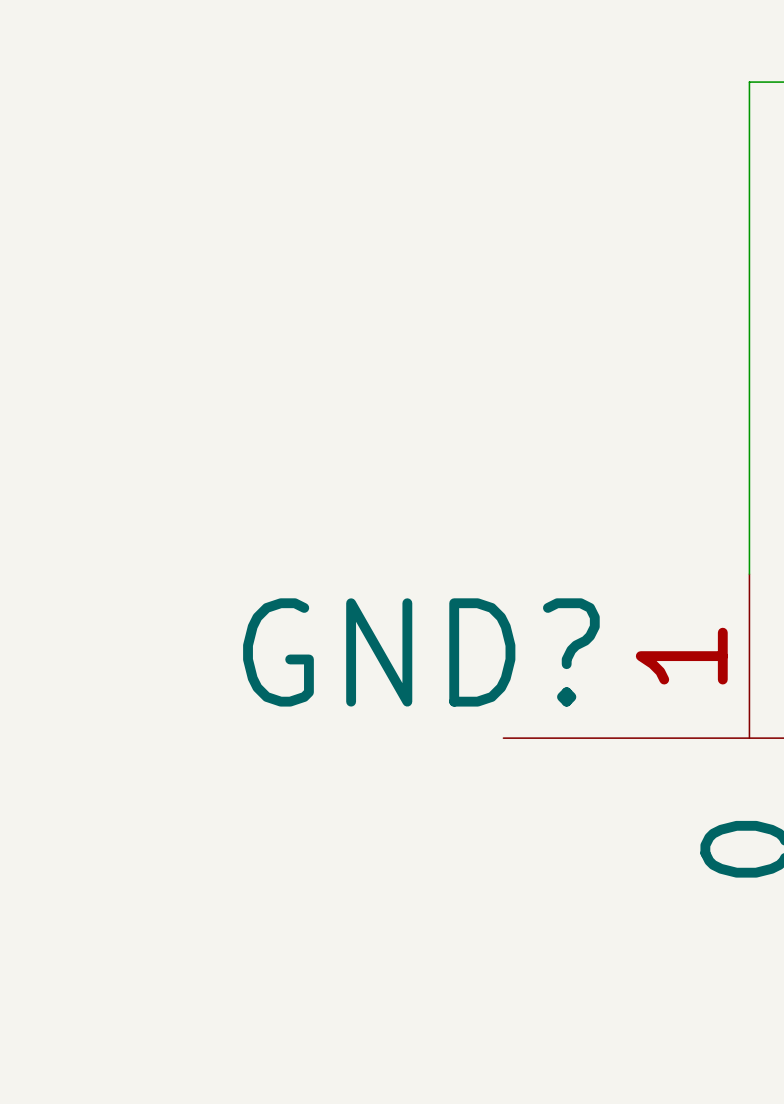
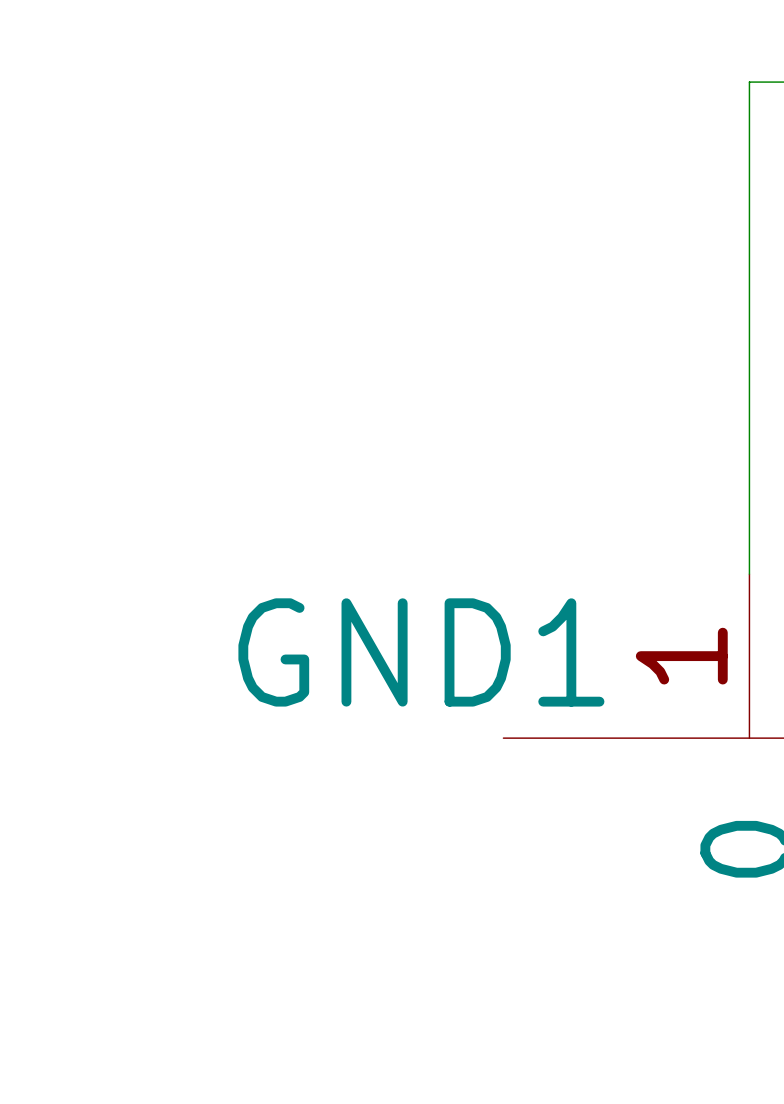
GND? name: GND? (421, 652) -> GND1 (421, 652)

